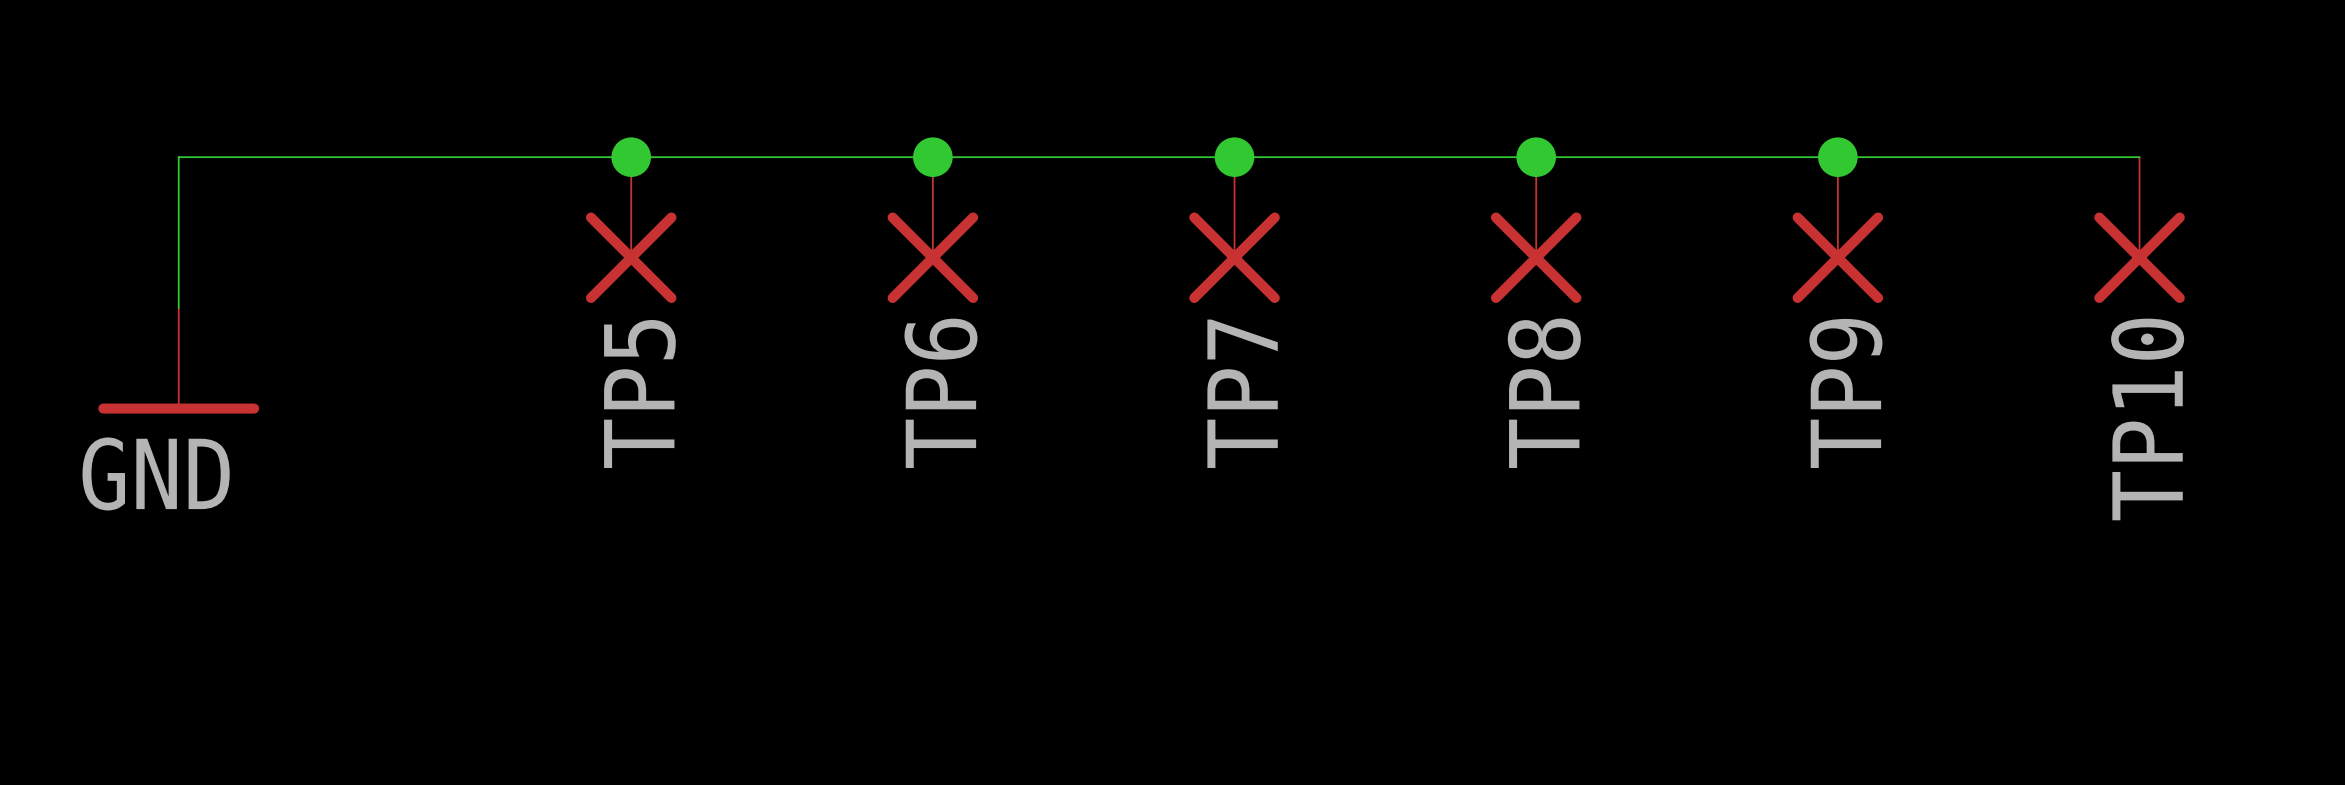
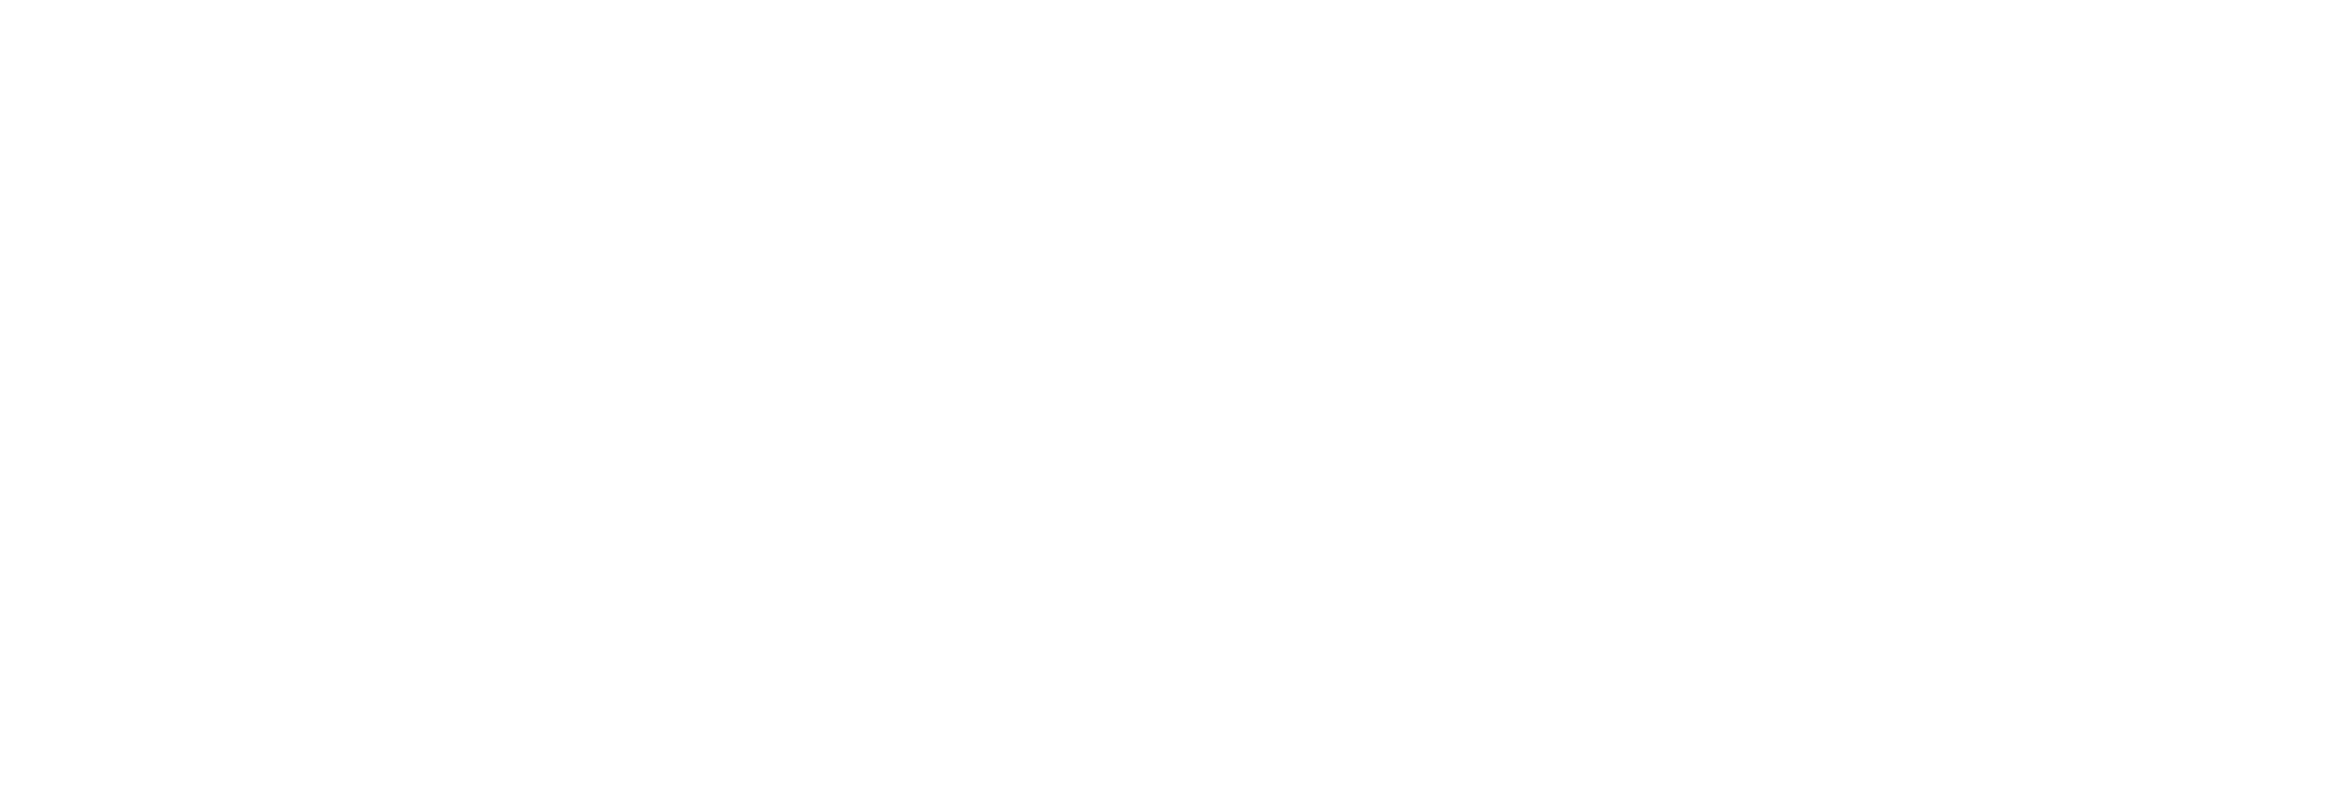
junction: (631, 157) -> none
junction: (932, 157) -> none
junction: (1234, 157) -> none
junction: (1536, 157) -> none
junction: (1837, 157) -> none
wire: (2139, 157) (178, 157) (178, 308) -> none
TP5: (631, 230) -> none
TP6: (932, 230) -> none
TP7: (1234, 230) -> none
TP8: (1536, 230) -> none
TP9: (1837, 230) -> none
TP10: (2139, 230) -> none
power symbol: GND (178, 360) -> none

